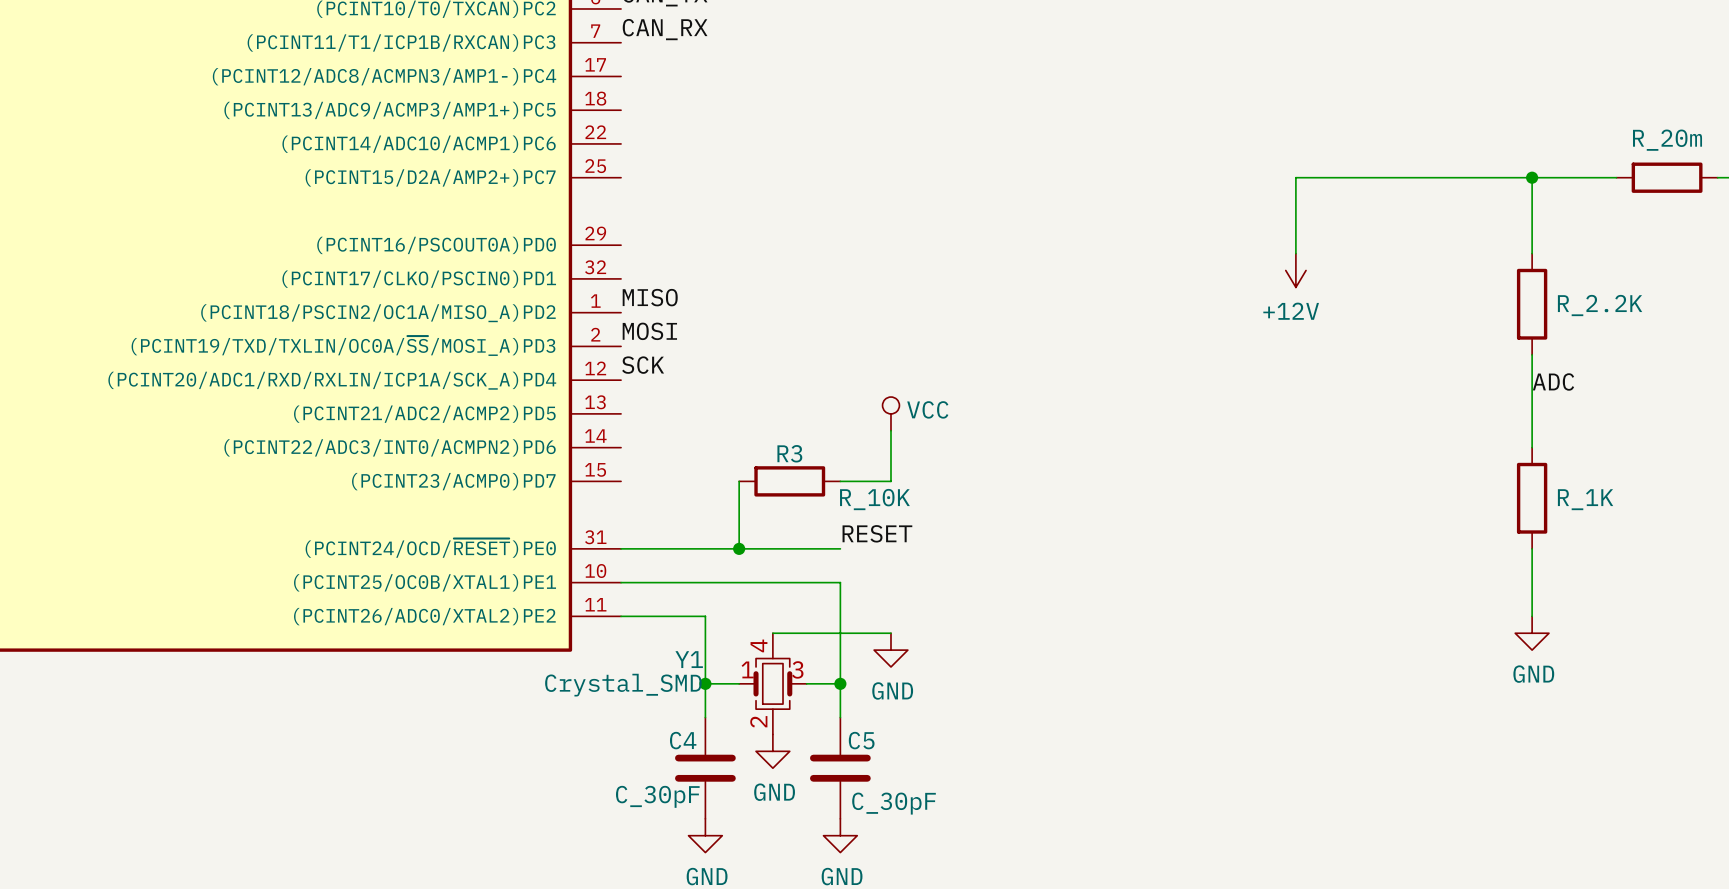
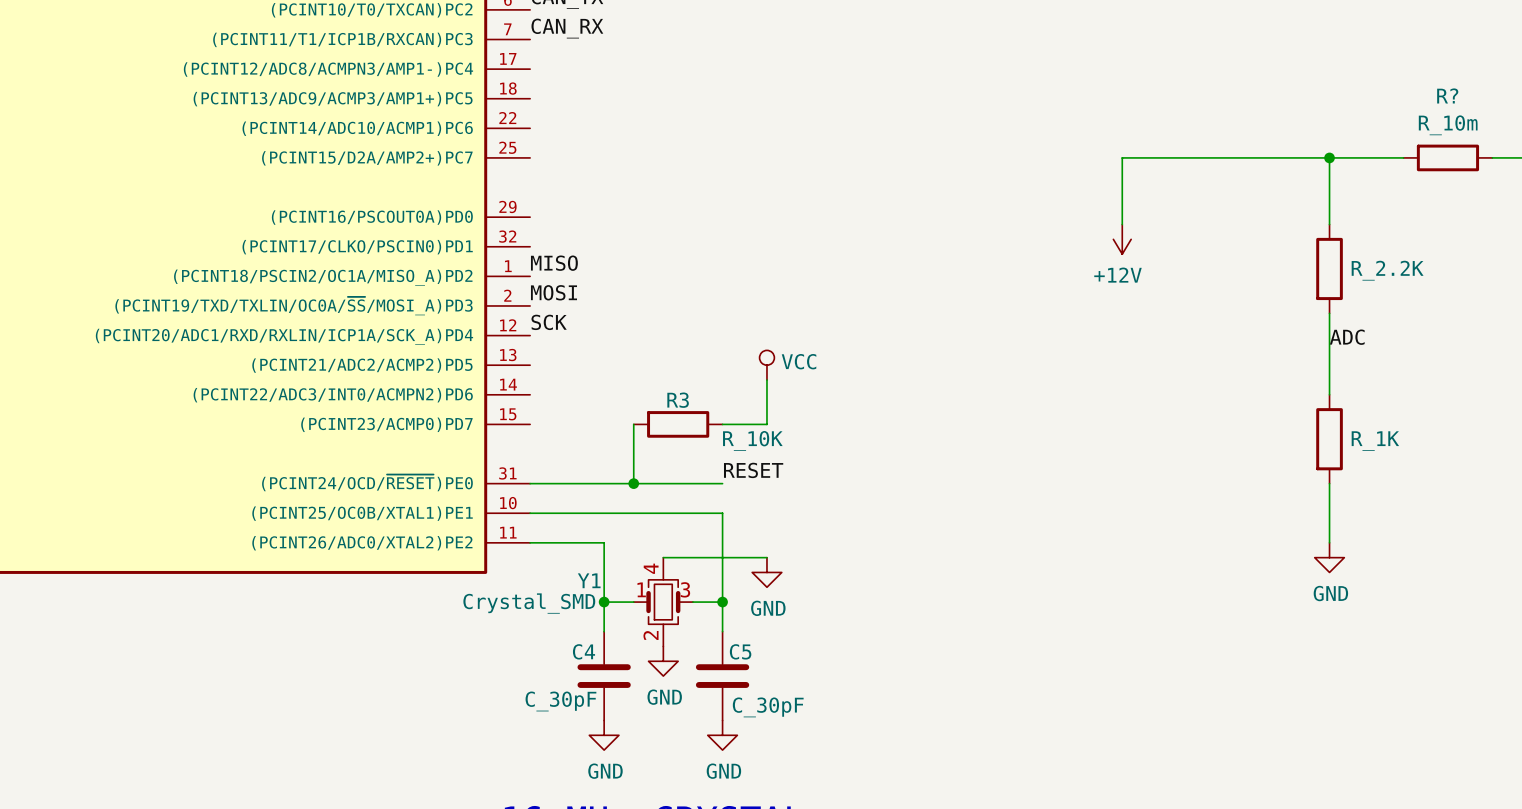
R? name: none -> R? (1447, 95)
R? value: R_20m (1667, 140) -> R_10m (1448, 125)

